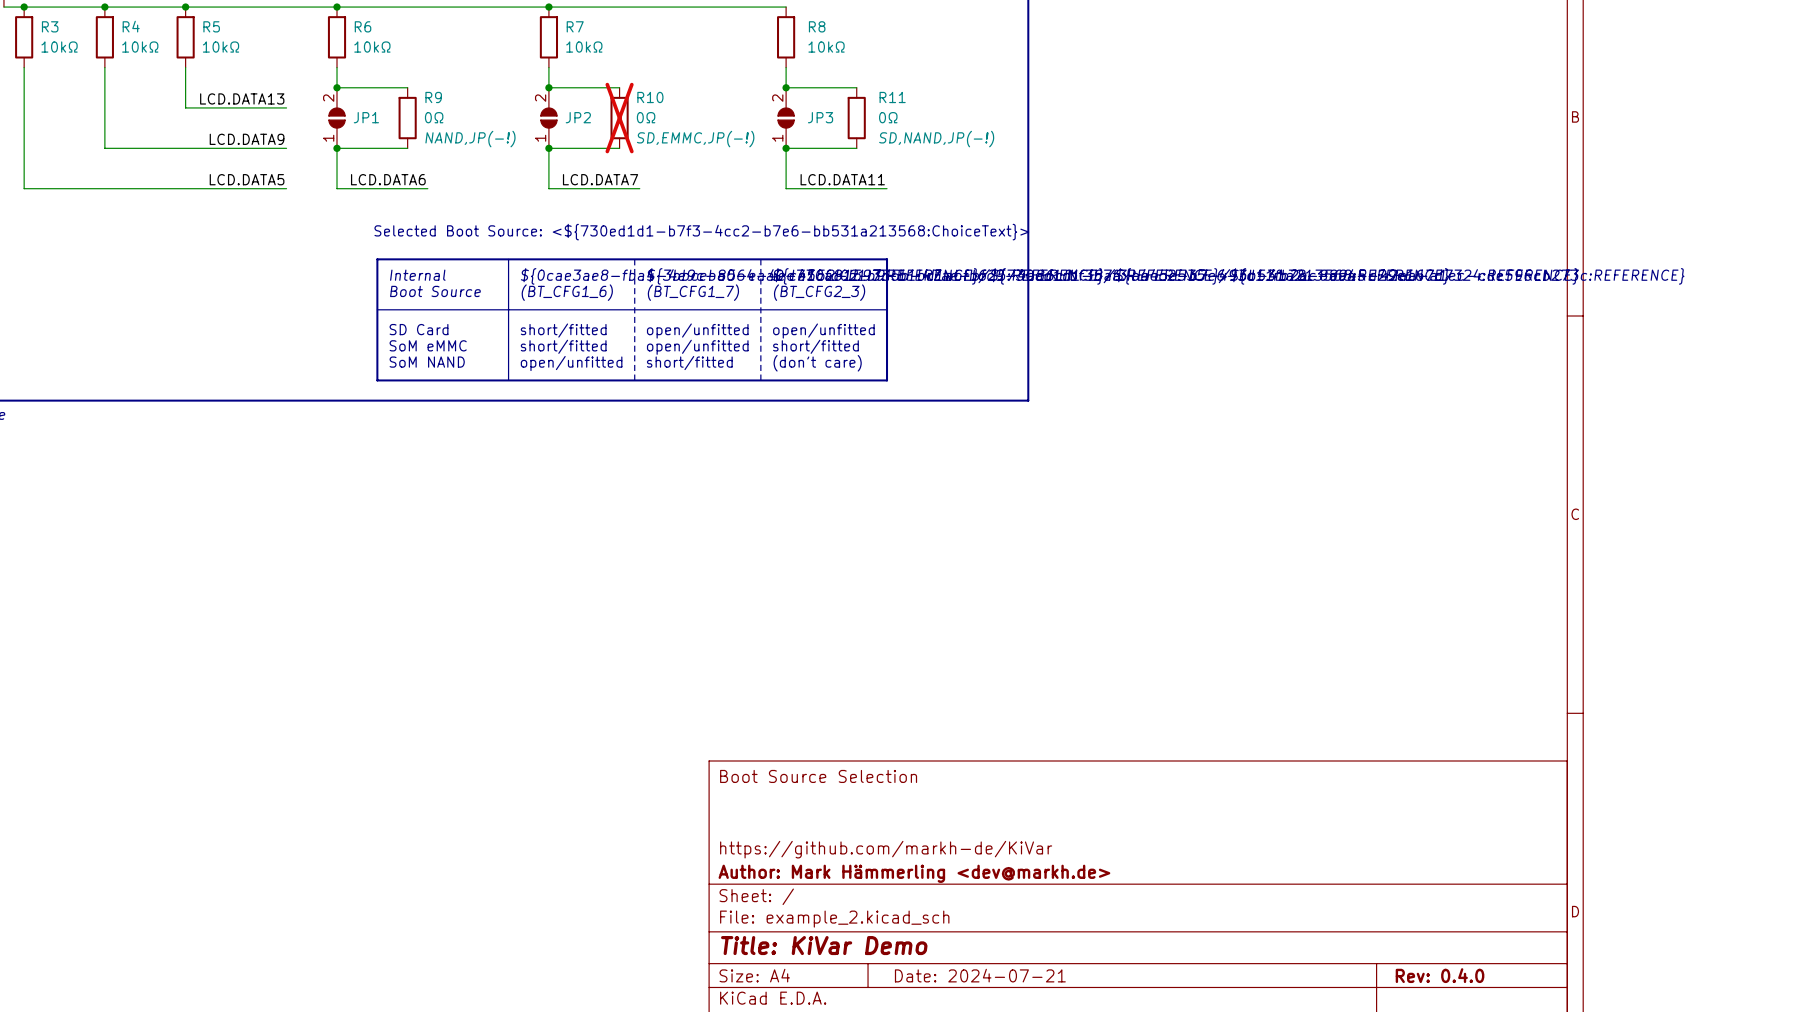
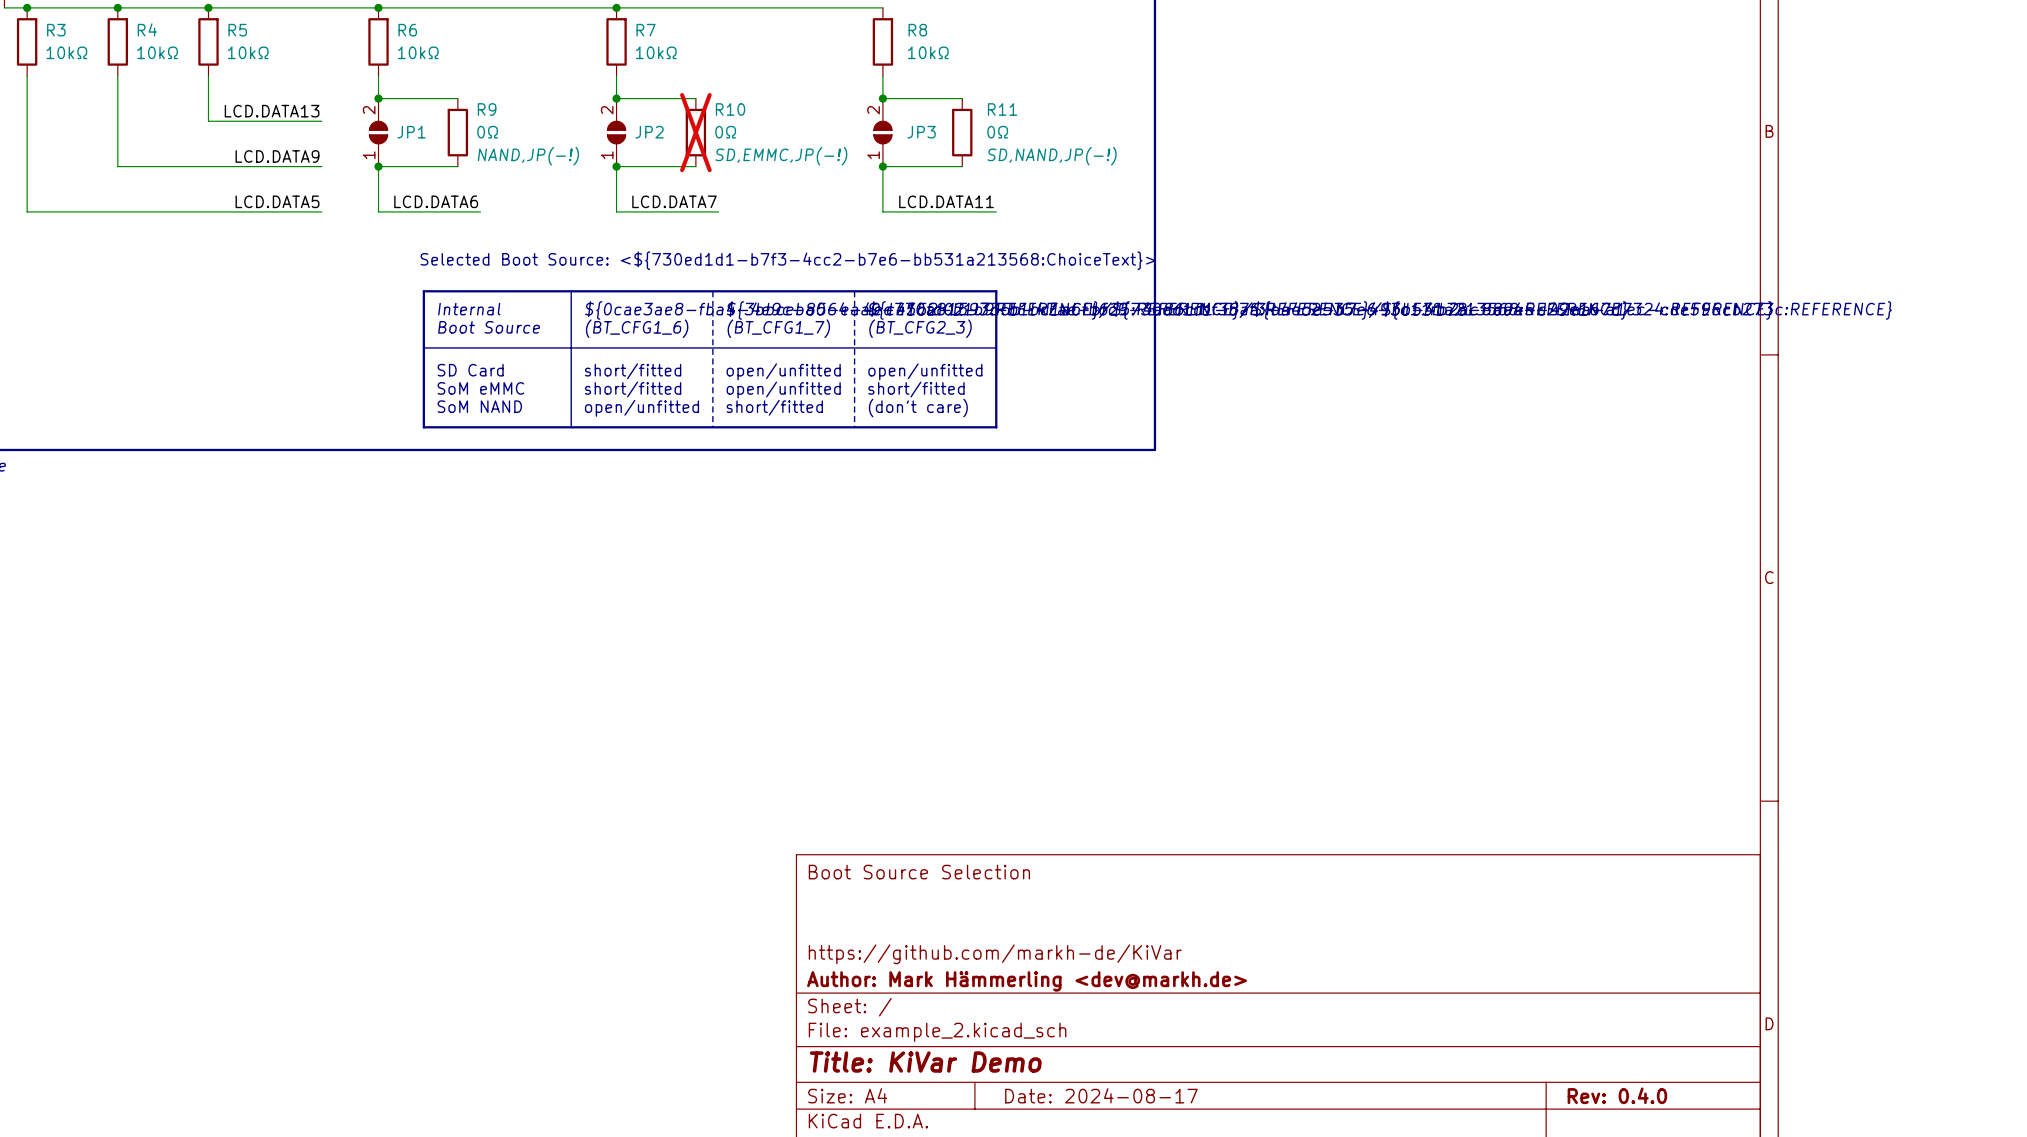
title block: Date: 2024-07-21 (980, 975) -> Date: 2024-08-17 (1101, 1095)

